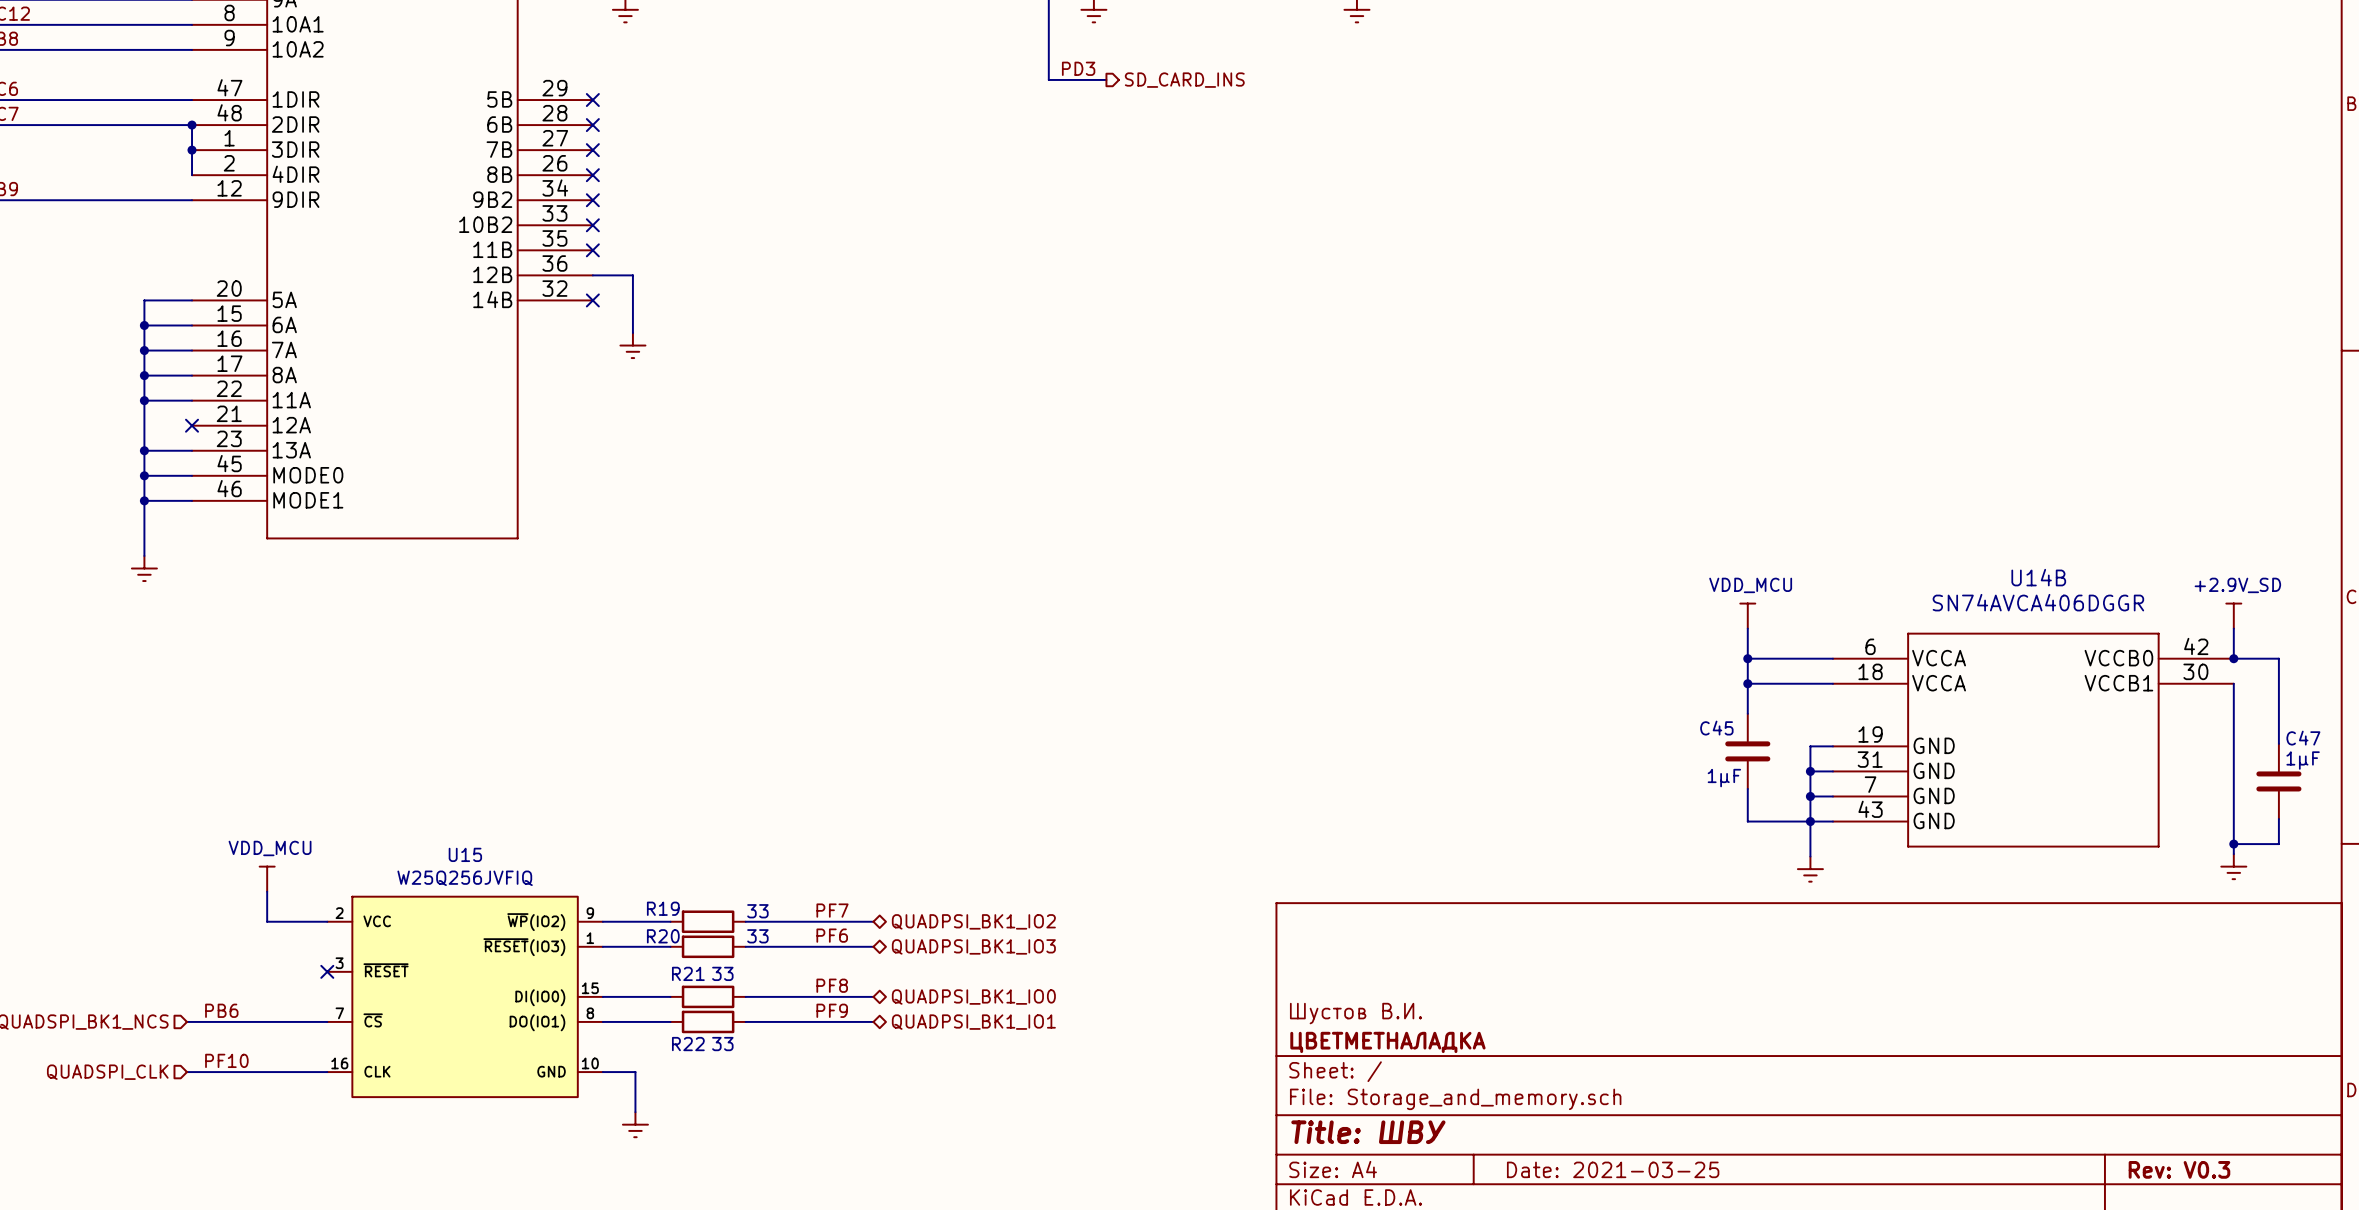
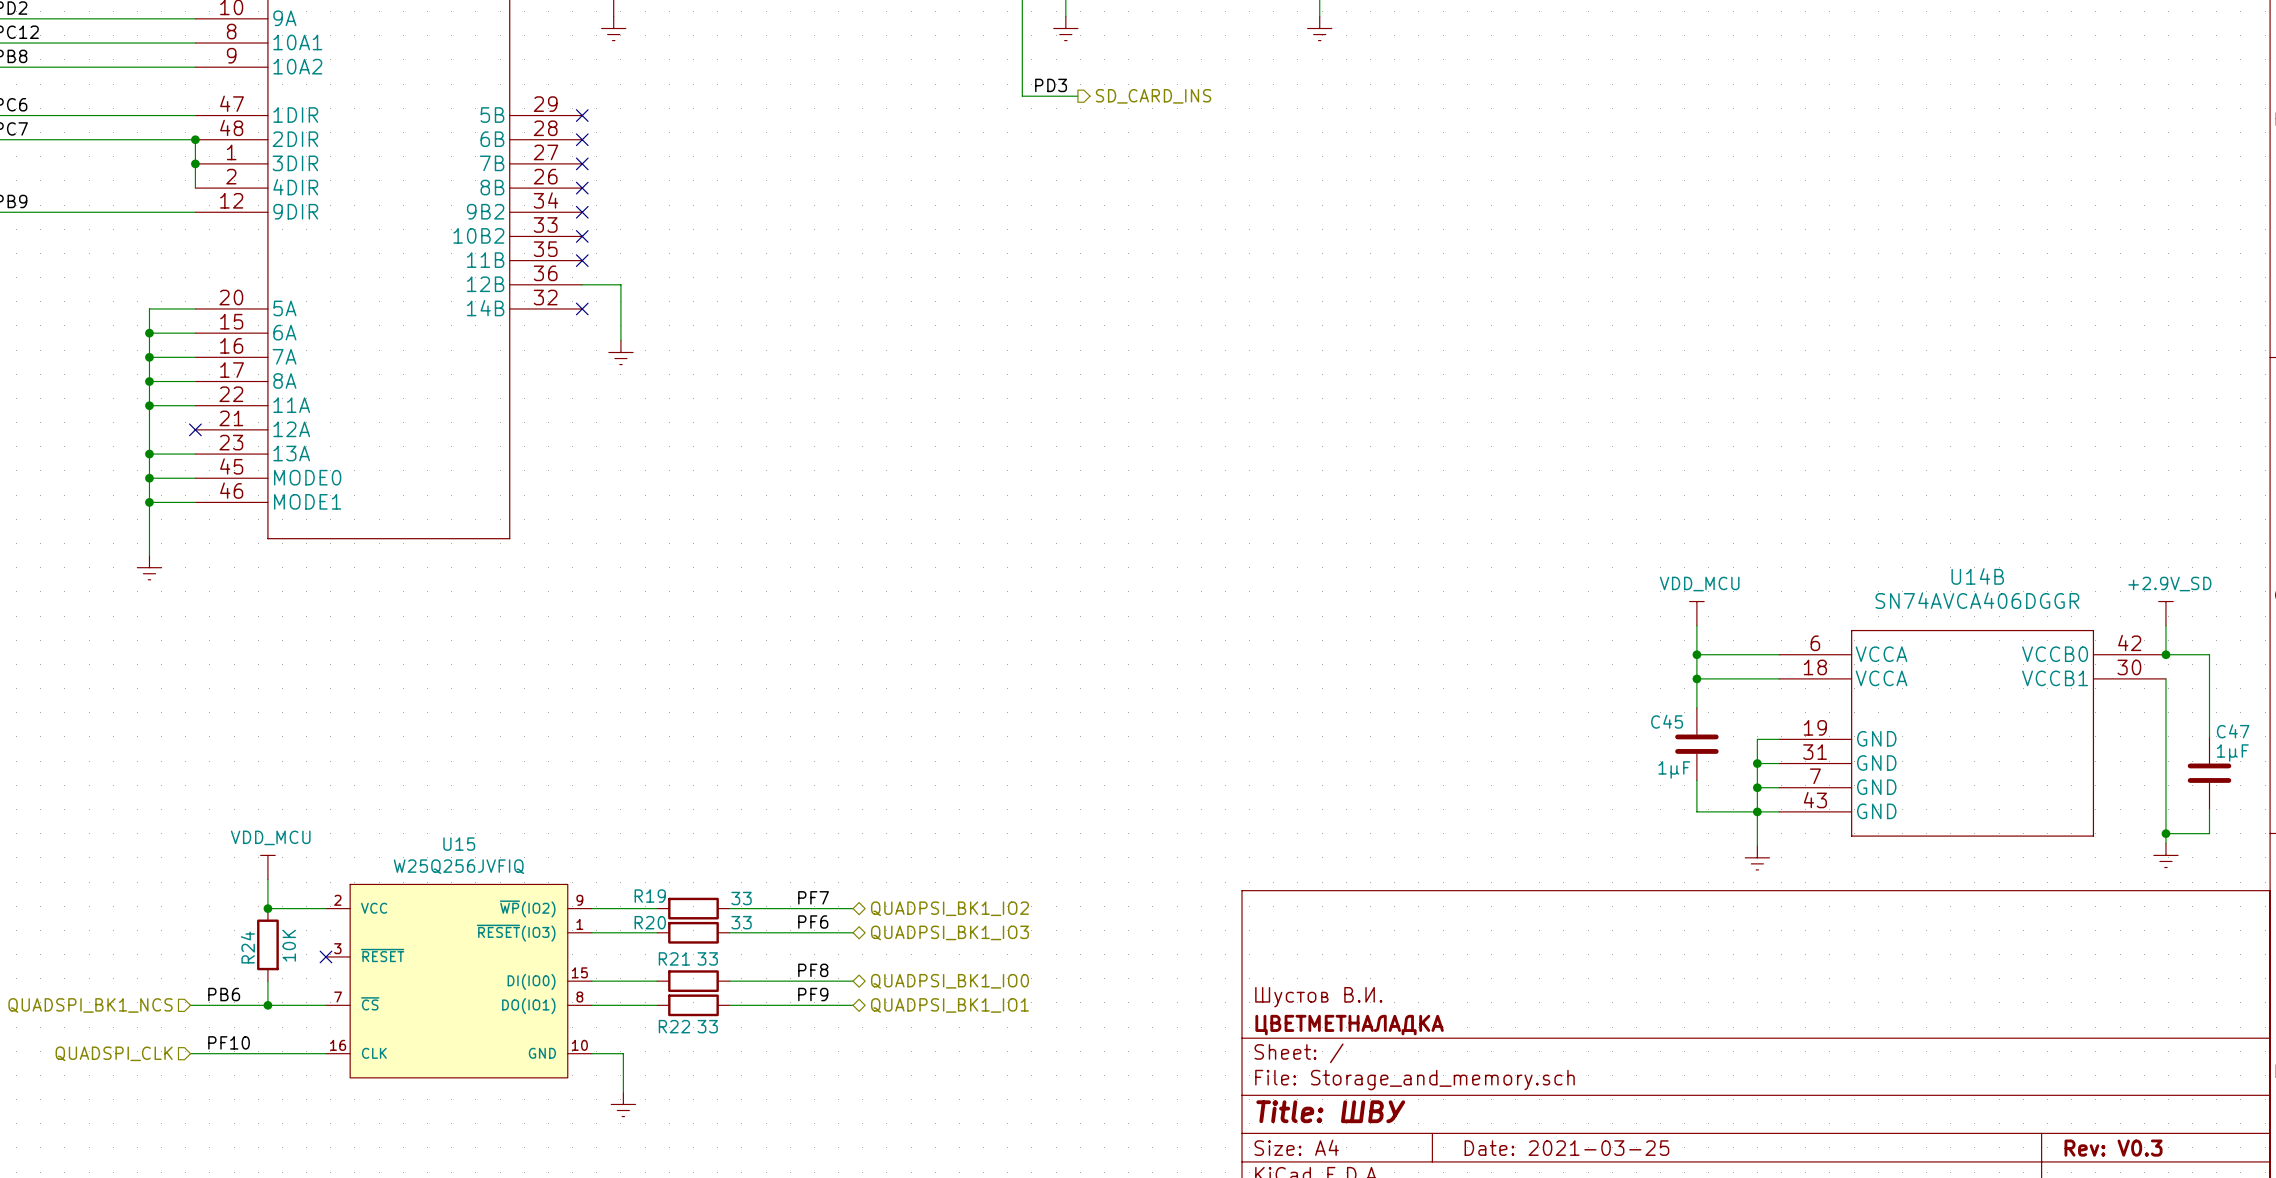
junction: none -> (267, 908)
R24: none -> 10K (267, 944)
wire: none -> (267, 981) (267, 1005)
junction: none -> (267, 1005)

